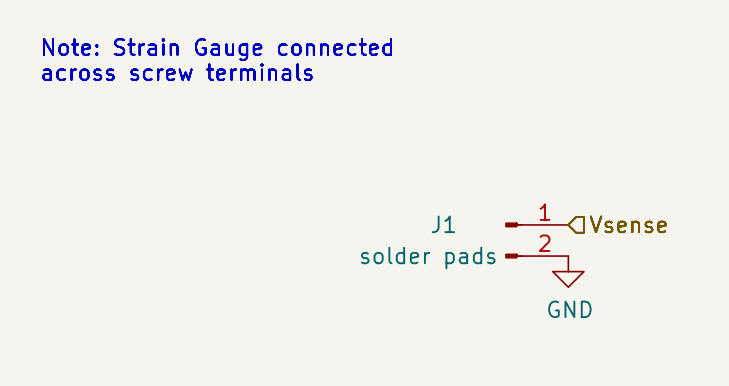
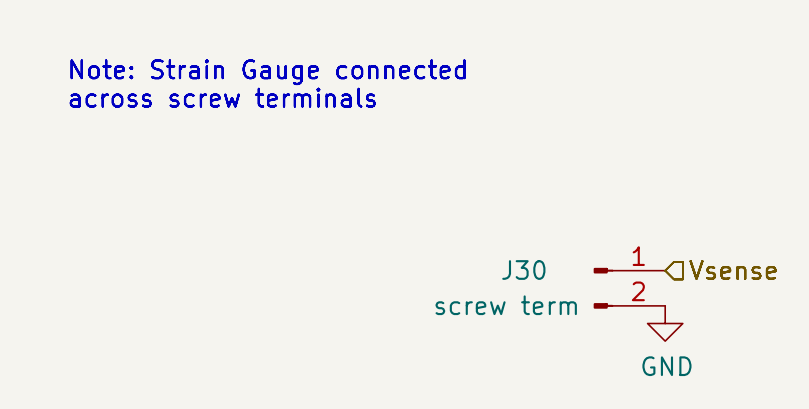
J1 name: J1 (443, 224) -> J30 (523, 270)
J1 value: solder pads (428, 258) -> screw term (506, 305)

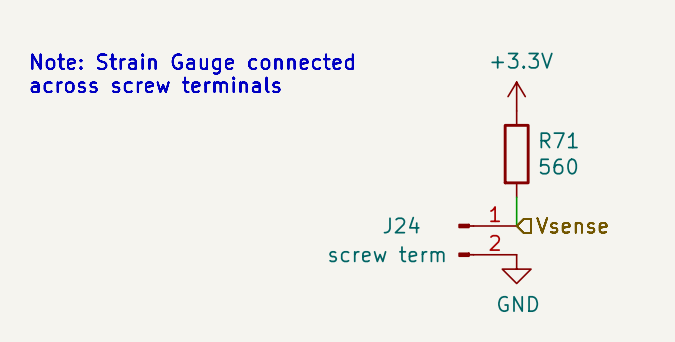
power symbol: none -> +3.3V (516, 96)
R71: none -> 560 (516, 154)
wire: none -> (516, 197) (516, 225)
J30 name: J30 (523, 270) -> J24 (401, 225)

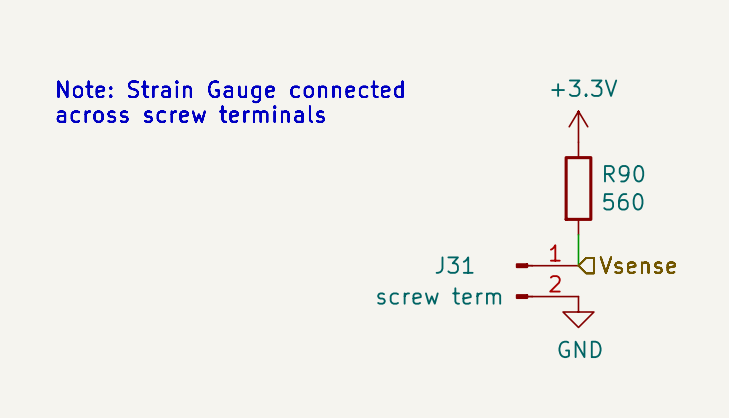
R71 name: R71 (559, 140) -> R90 (624, 173)
J24 name: J24 (401, 225) -> J31 (454, 265)

